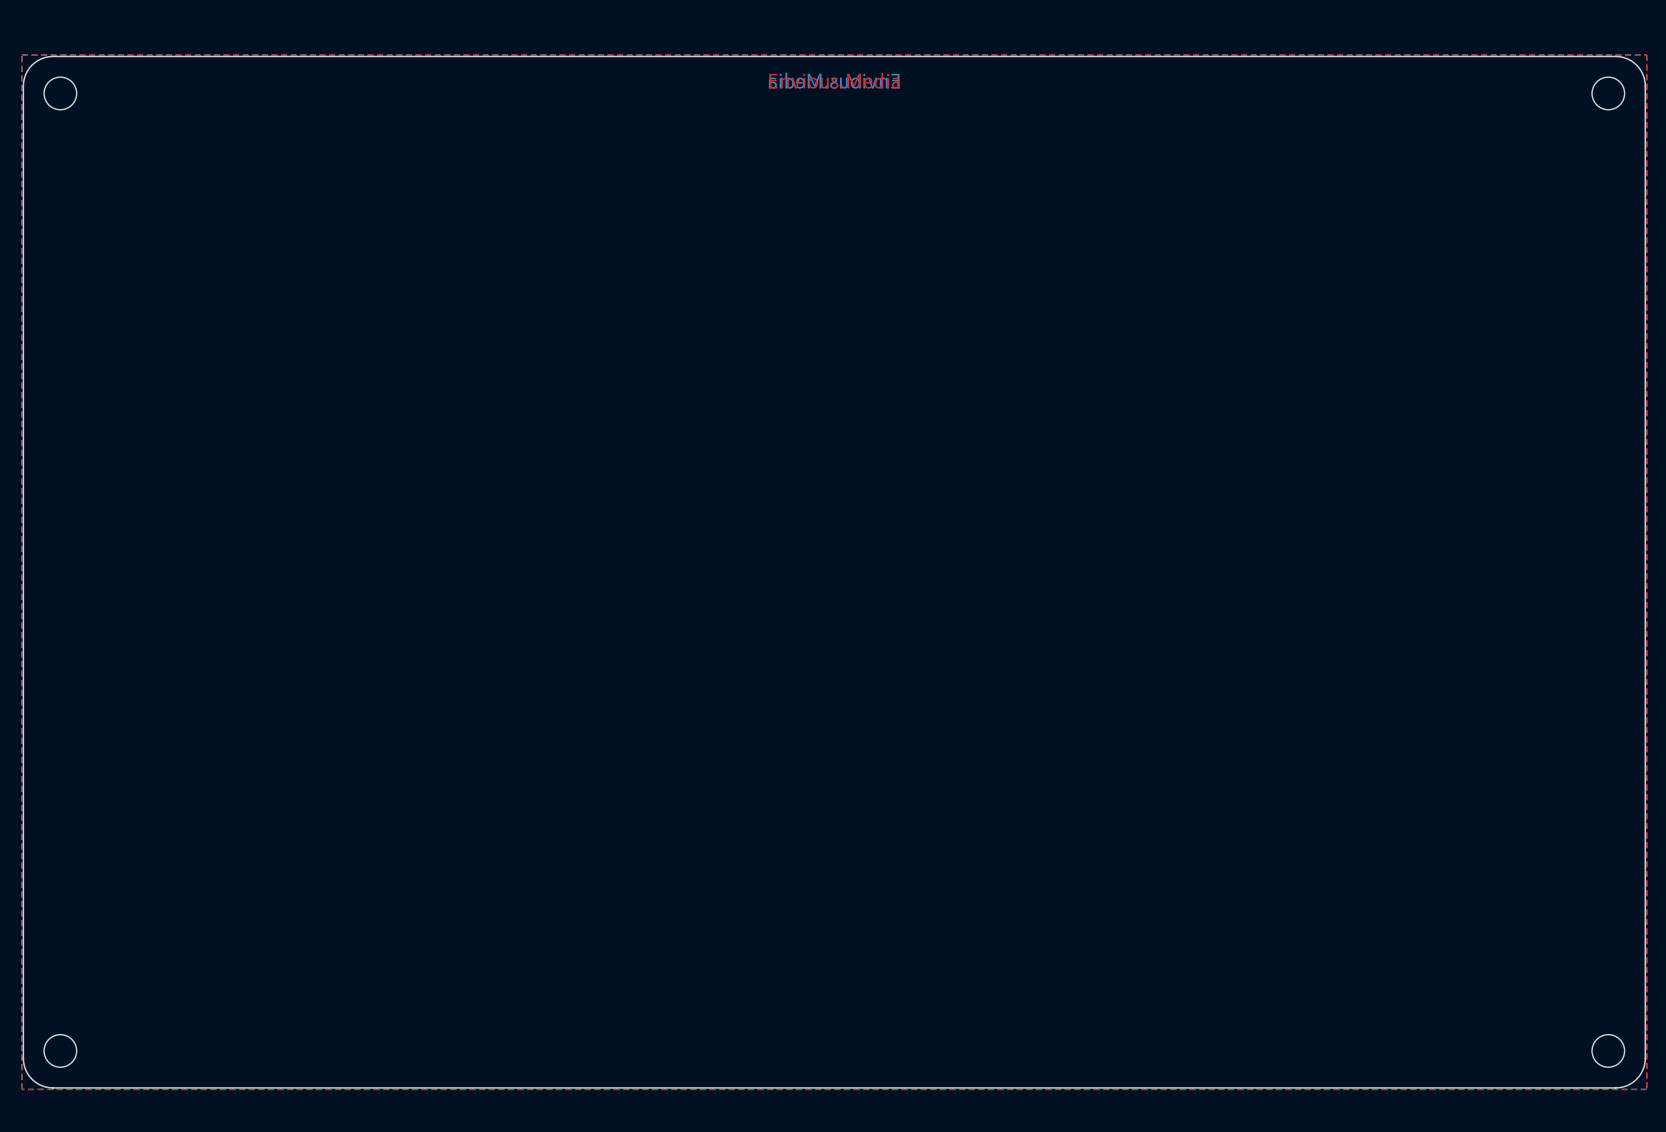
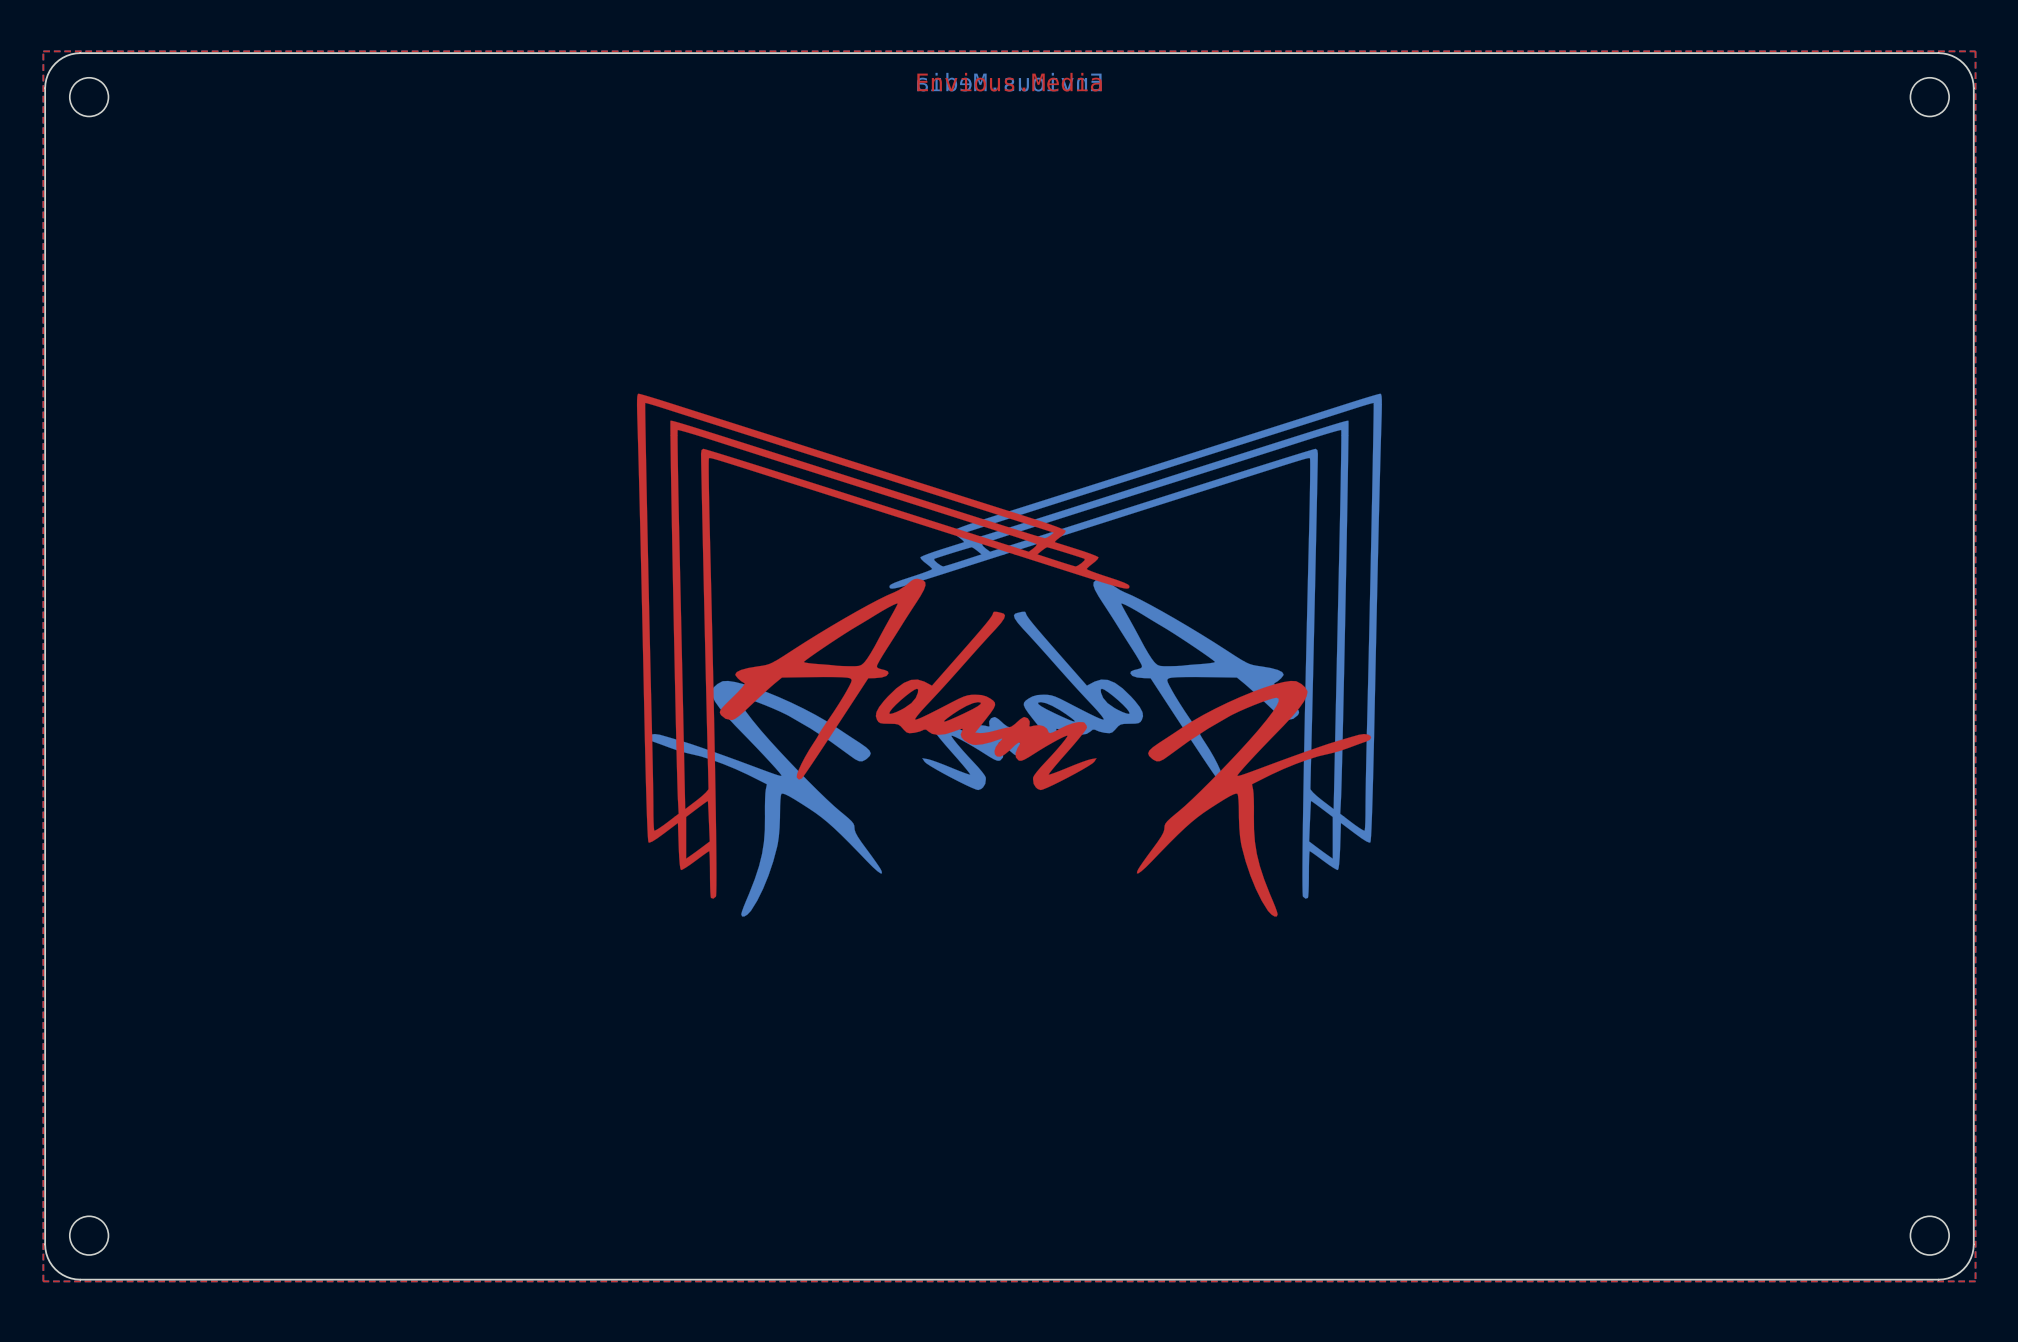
drawing: none -> [636, 393, 1382, 917]

